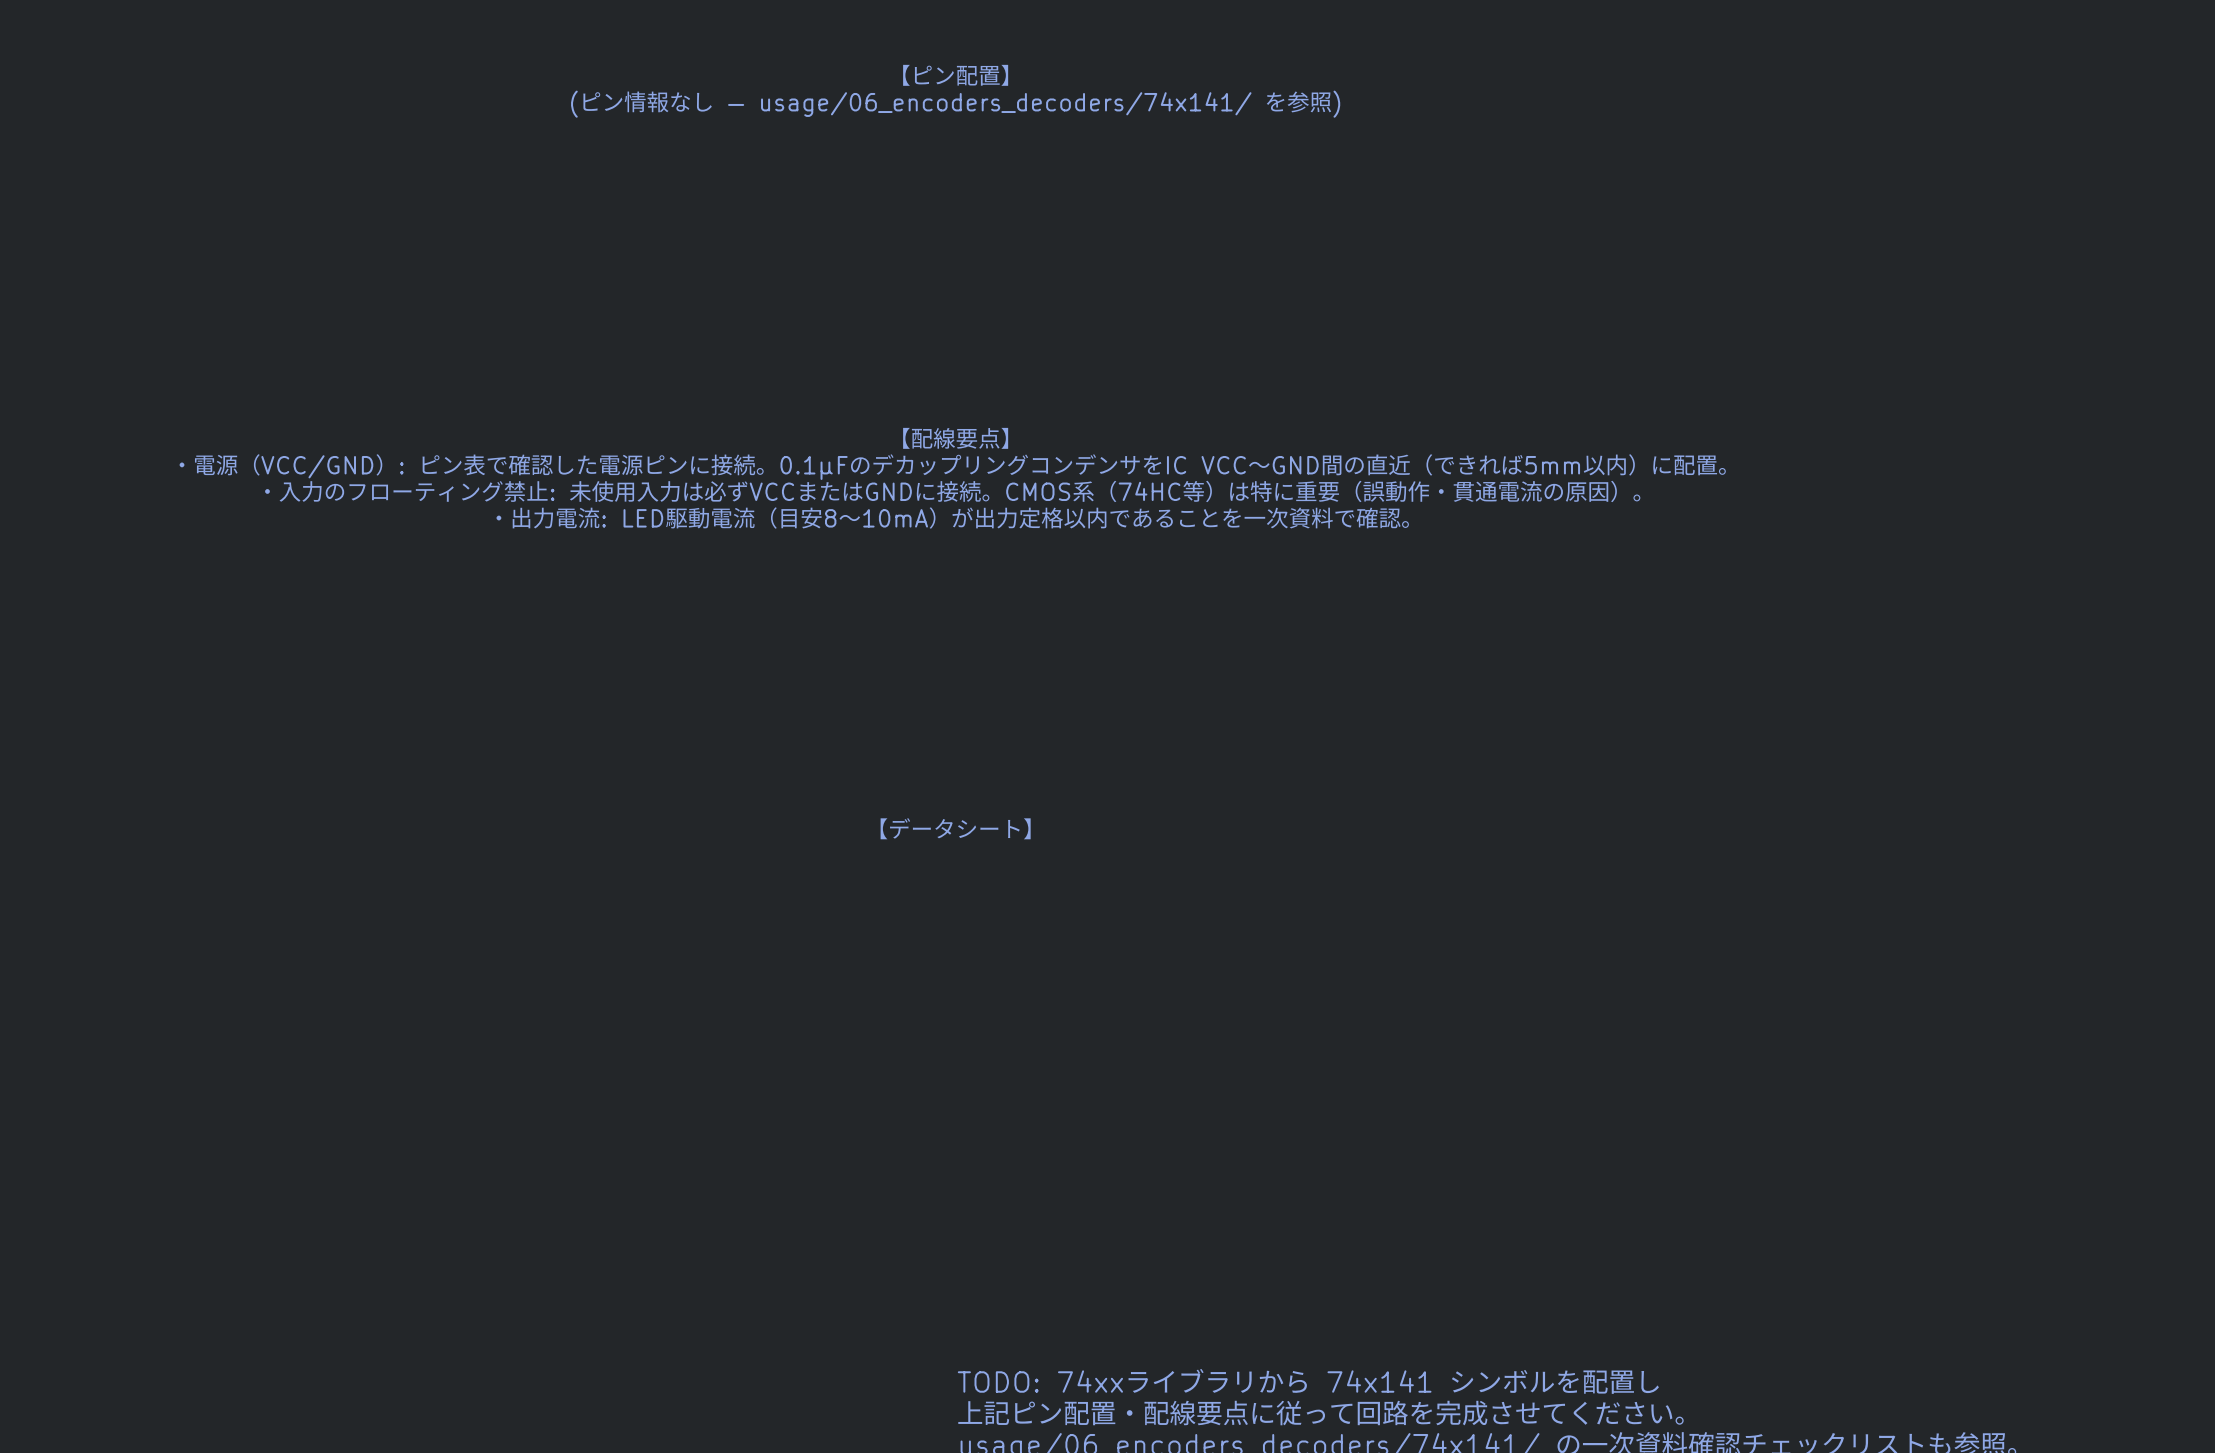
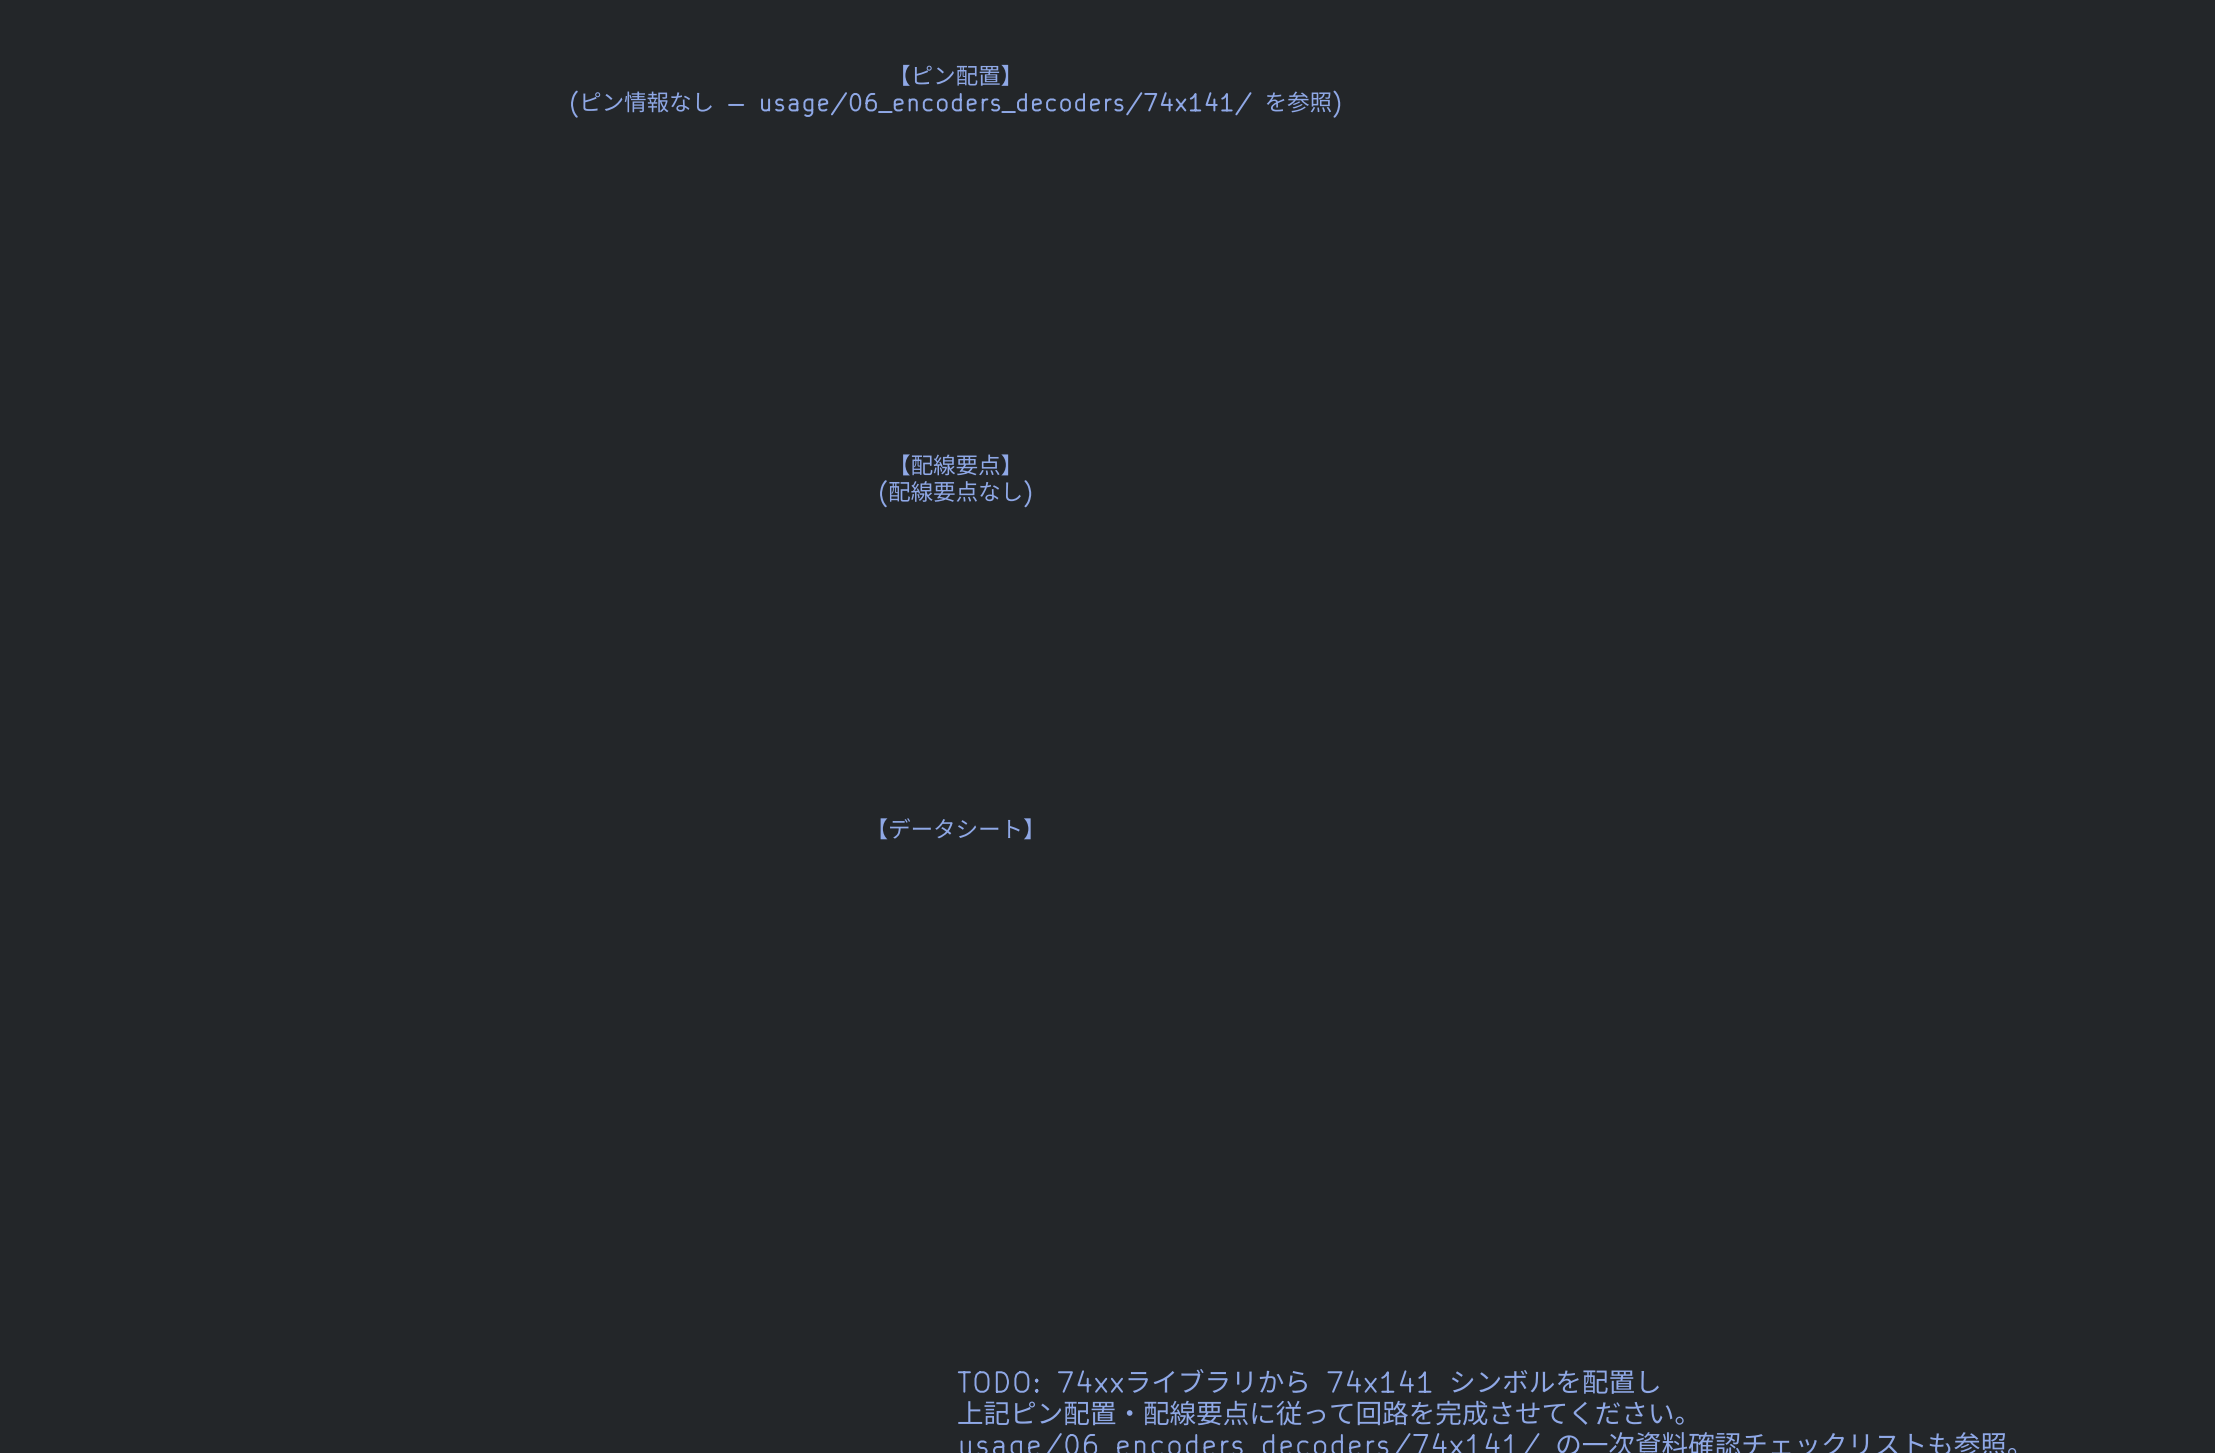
text: 【配線要点】 (955, 438) -> none
text: ・電源（VCC/GND）: ピン表で確認した電源ピンに接続。0.1µFのデカップリングコンデンサをIC VCC〜GND間の直近（できれば5mm以内）に配置。 (952, 466) -> 【配線要点】 (955, 464)
text: ・入力のフローティング禁止: 未使用入力は必ずVCCまたはGNDに接続。CMOS系（74HC等）は特に重要（誤動作・貫通電流の原因）。 (952, 491) -> (配線要点なし) (955, 493)
text: ・出力電流: LED駆動電流（目安8〜10mA）が出力定格以内であることを一次資料で確認。 (952, 518) -> none

